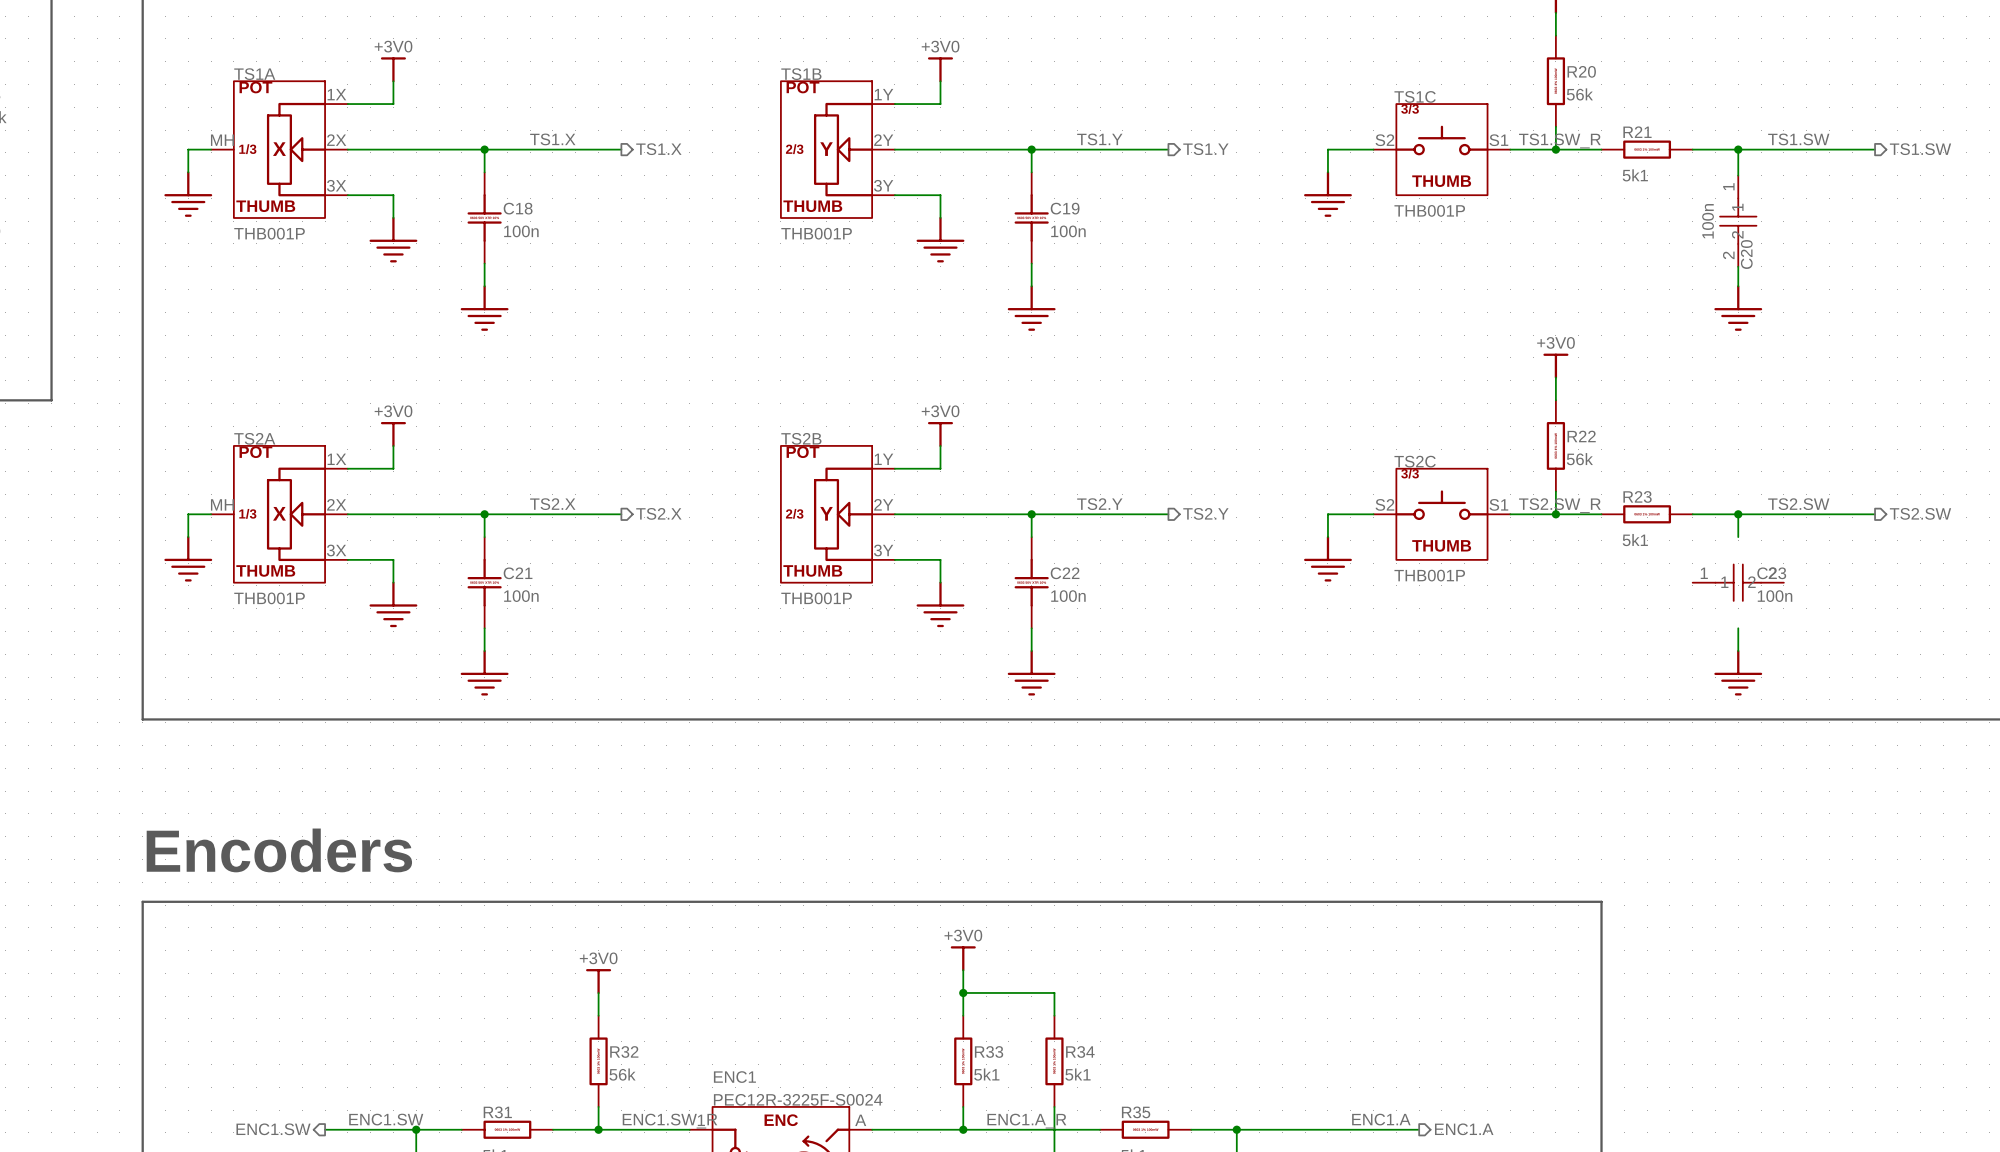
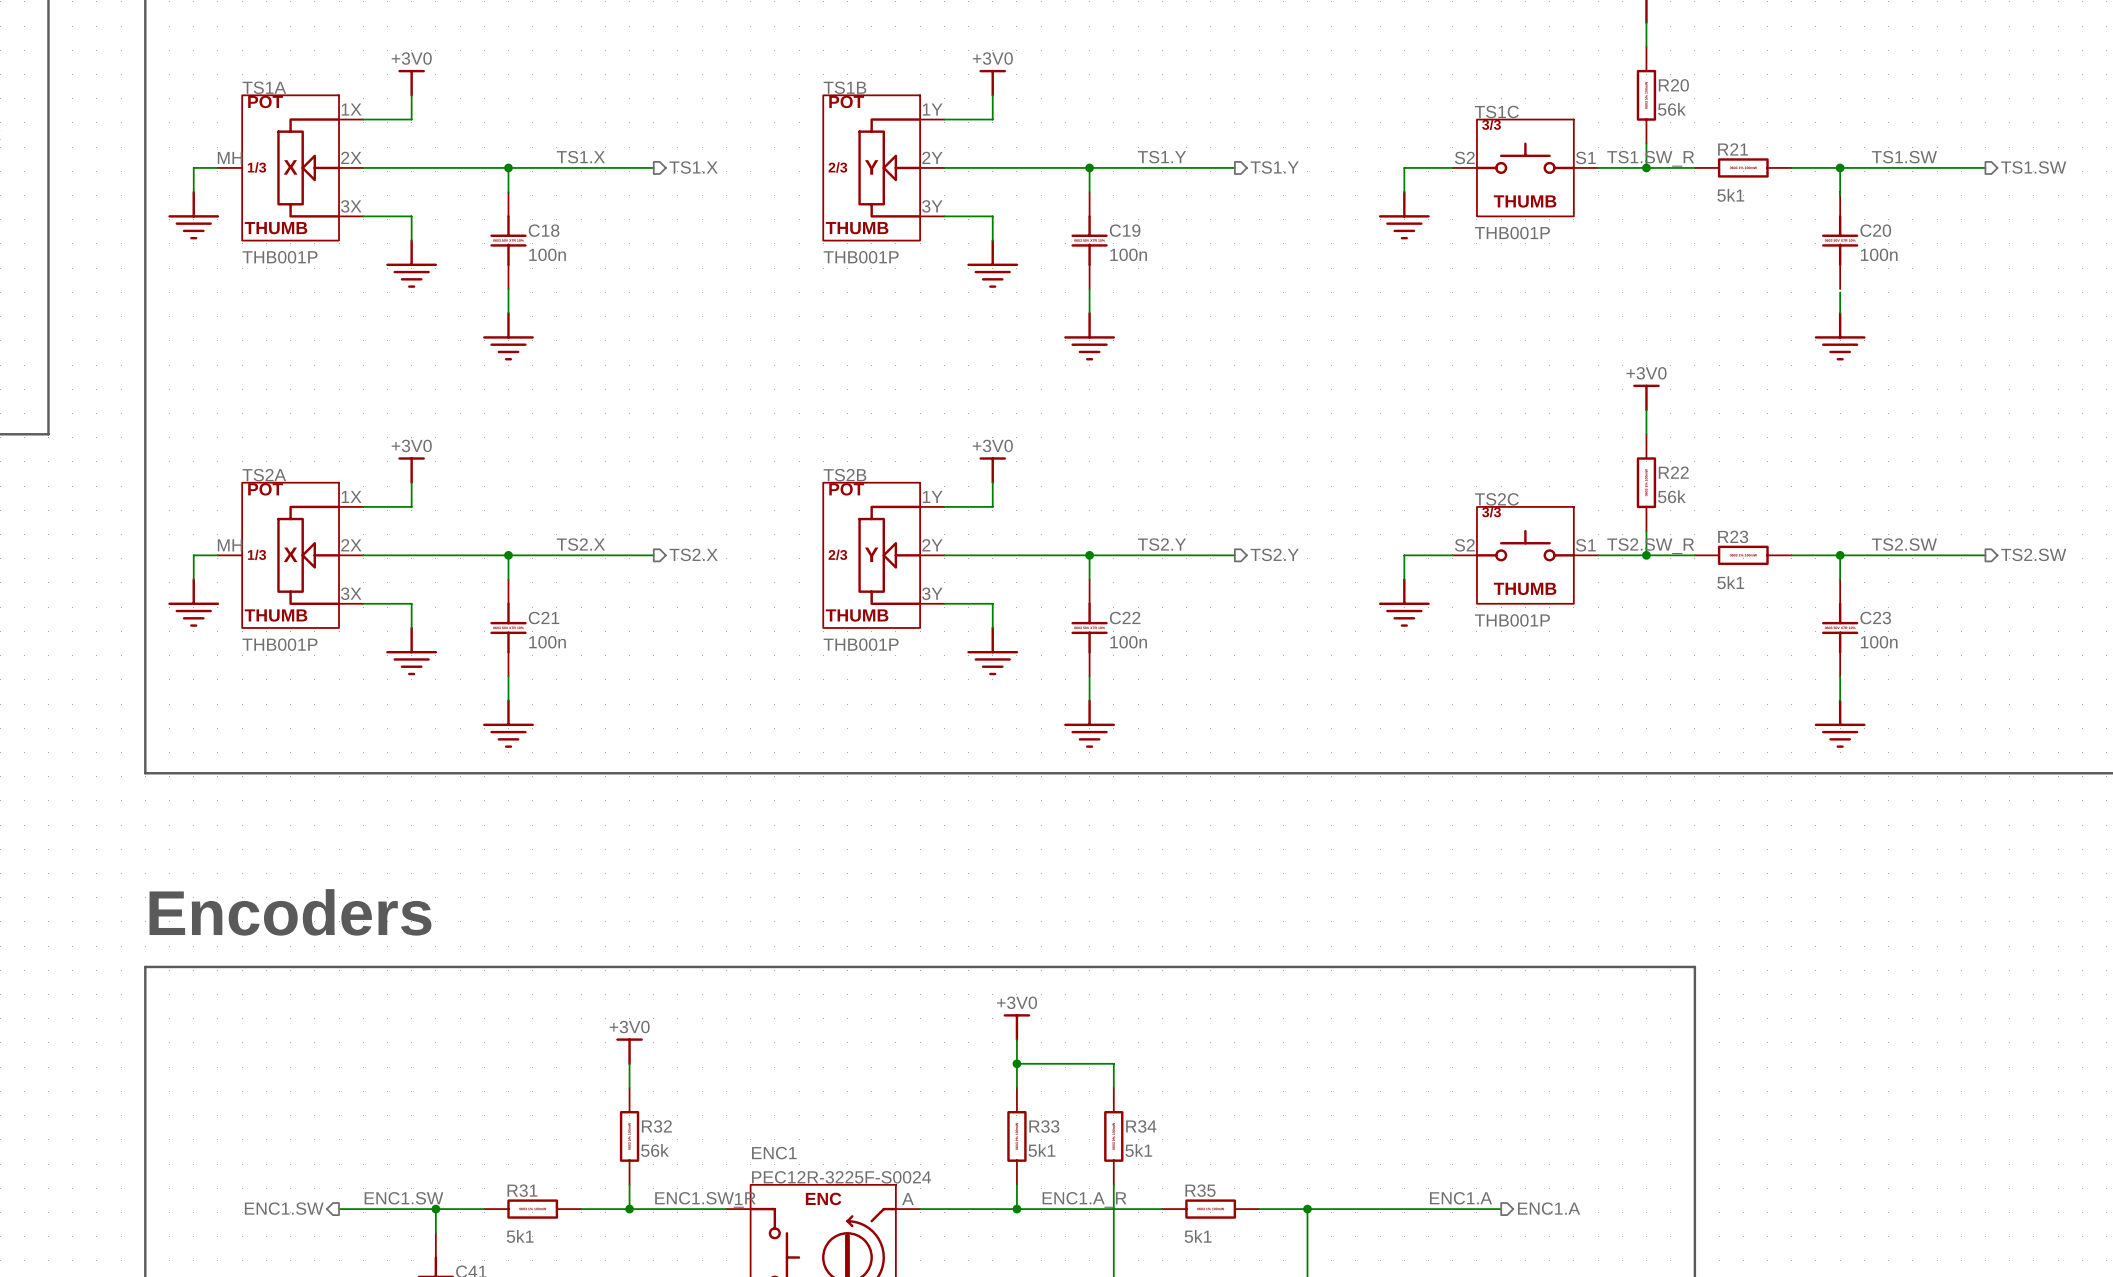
C20 symbol: [1720, 175, 1757, 267] -> [1821, 192, 1859, 290]
C20 value position: 100n (1708, 221) -> 100n (1879, 254)
C20 name position: C20 (1746, 254) -> C20 (1875, 230)
C23 symbol: [1692, 564, 1784, 601] -> [1821, 579, 1859, 677]

